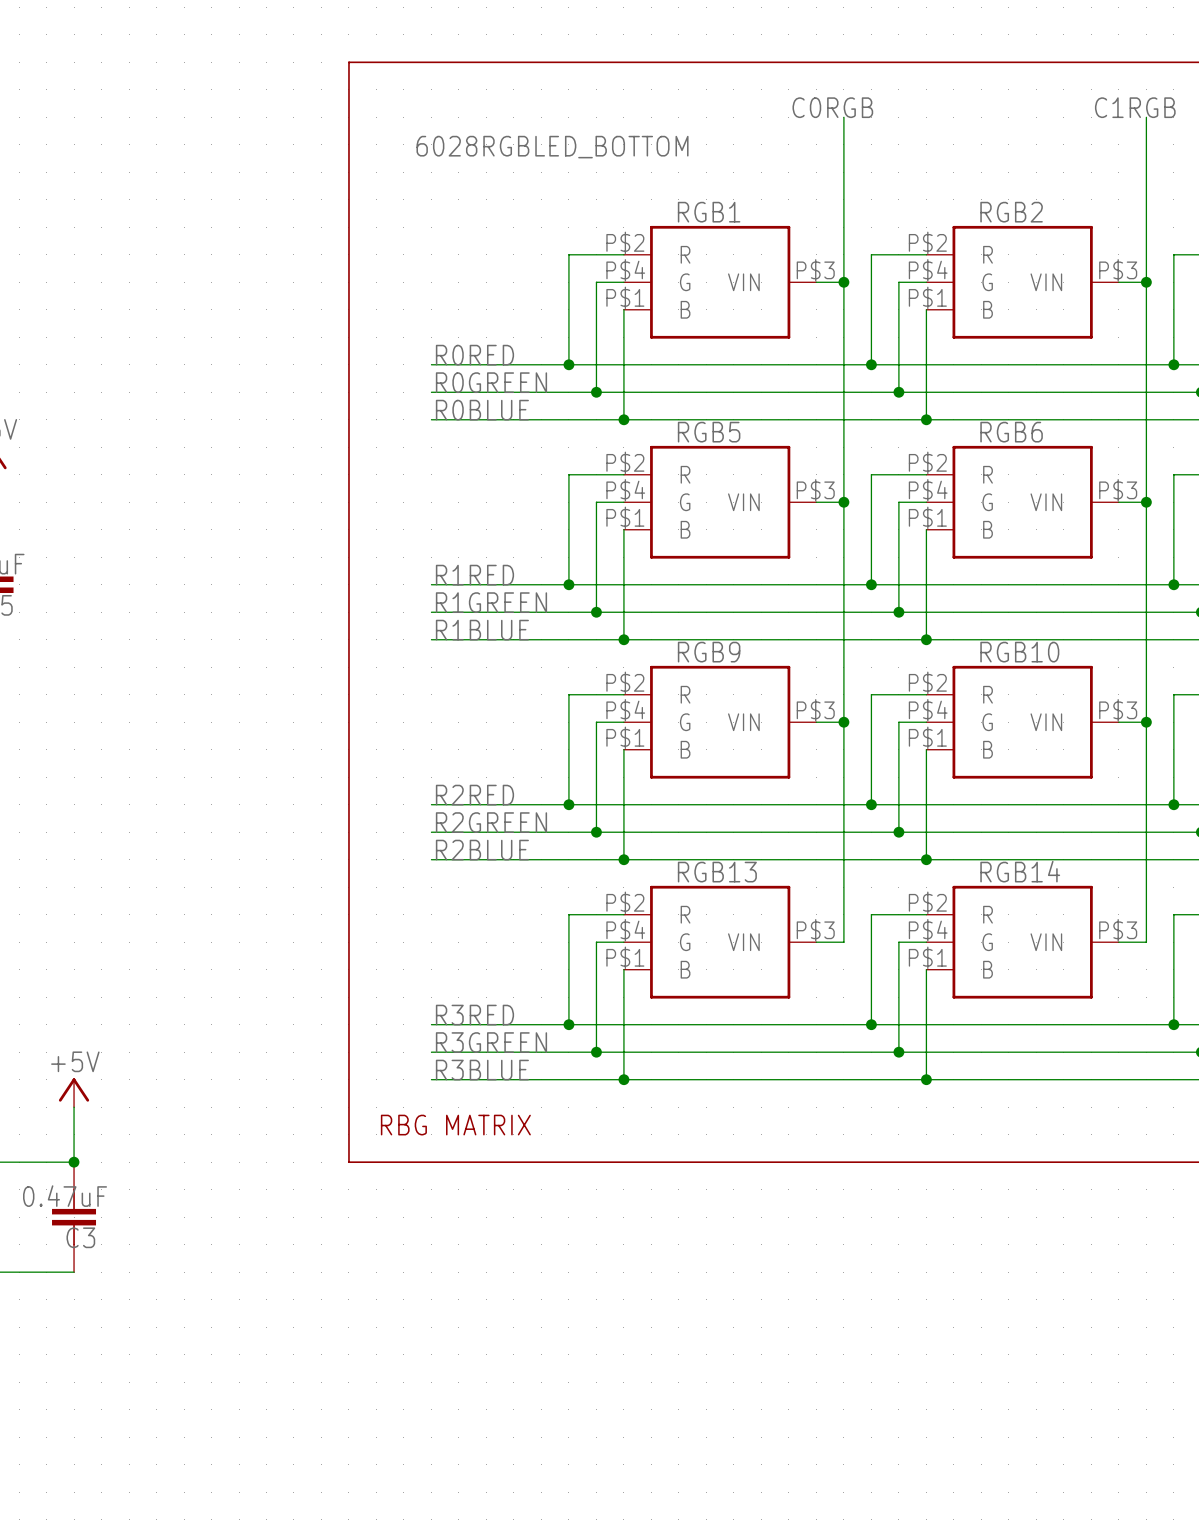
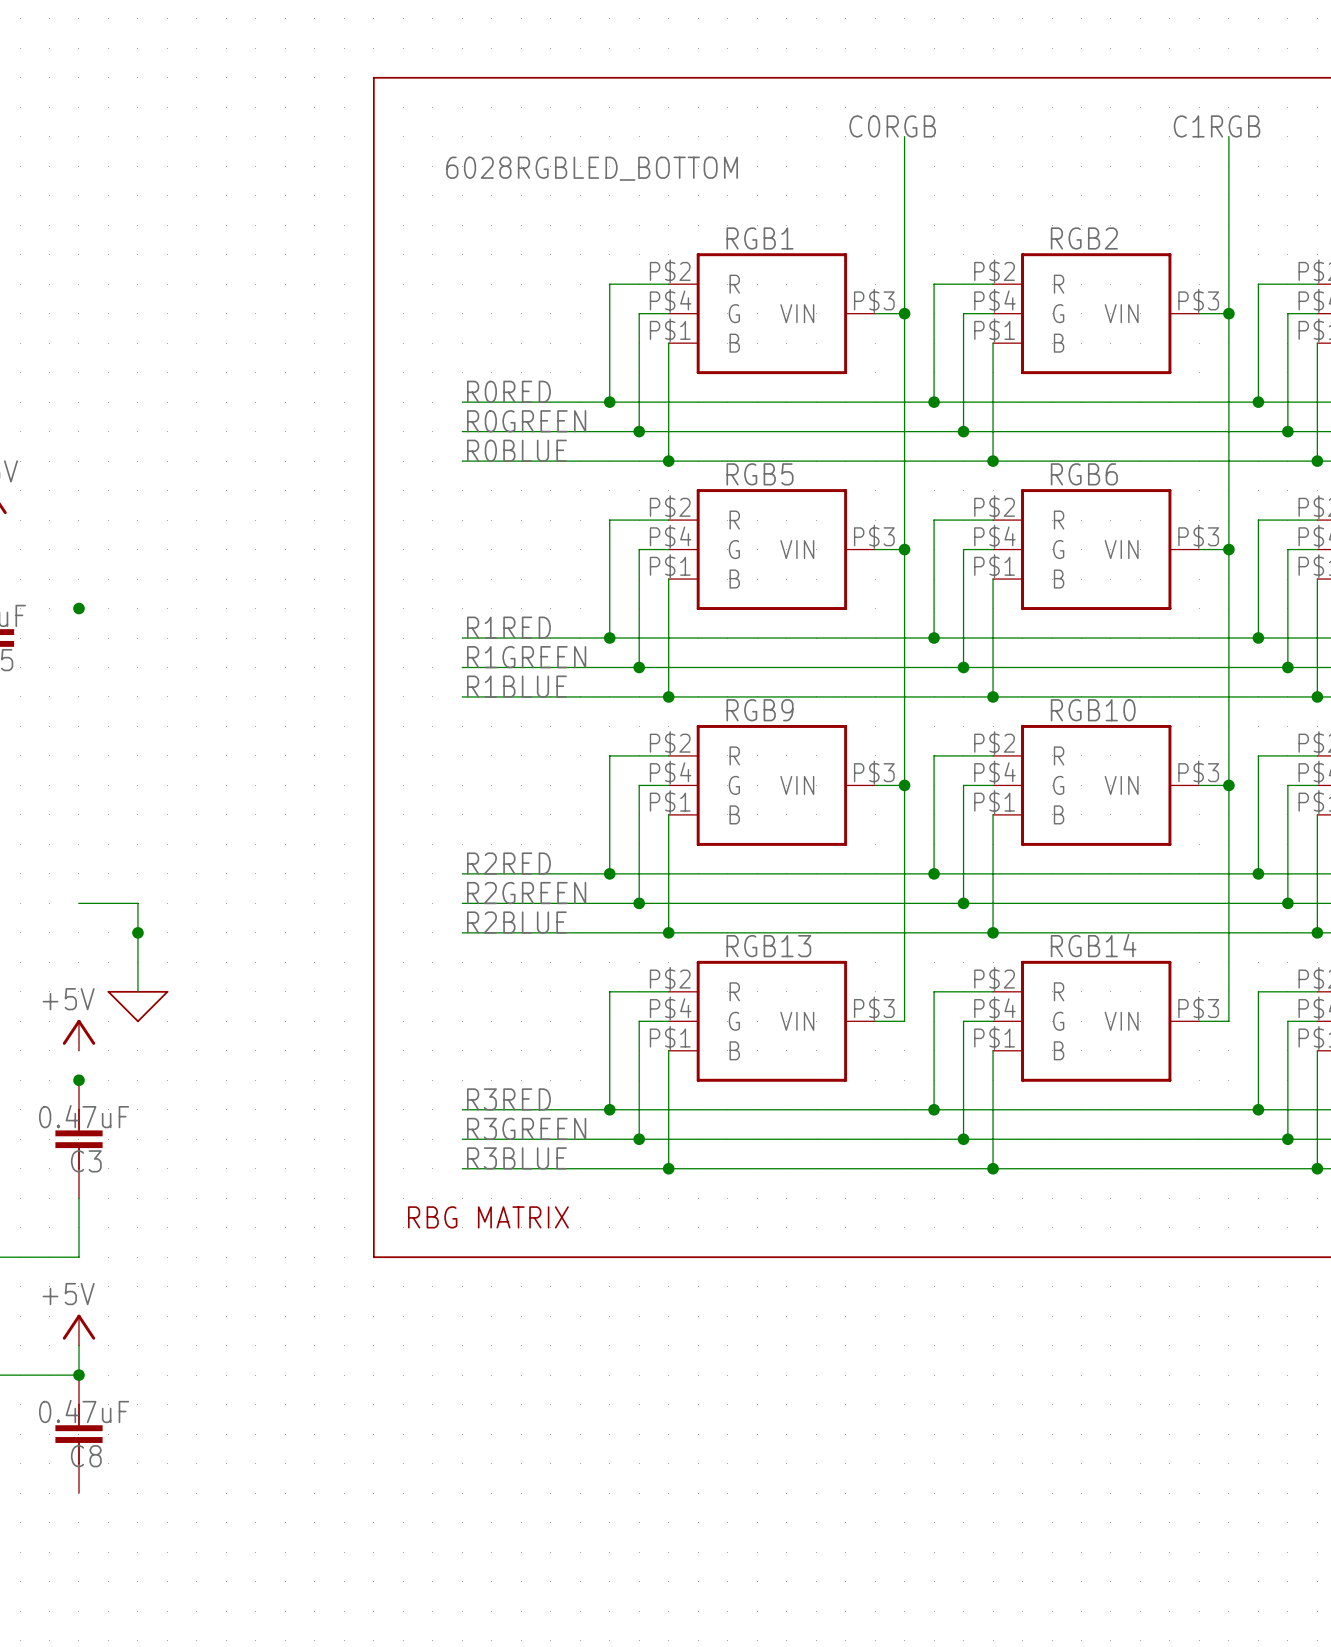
junction: none -> (78, 608)
wire: none -> (78, 903) (137, 903) (137, 991)
junction: none -> (137, 932)
power symbol: none -> (137, 1006)
power symbol: none -> +5V (78, 1035)
junction: none -> (78, 1080)
power symbol: +5V (74, 1092) -> none
junction: (74, 1162) -> none
C3 value position: 0.47uF (65, 1196) -> 0.47uF (84, 1116)
C3 position: (74, 1217) -> (78, 1139)
power symbol: none -> +5V (78, 1330)
junction: none -> (78, 1375)
C8: none -> 0.47uF (78, 1434)

